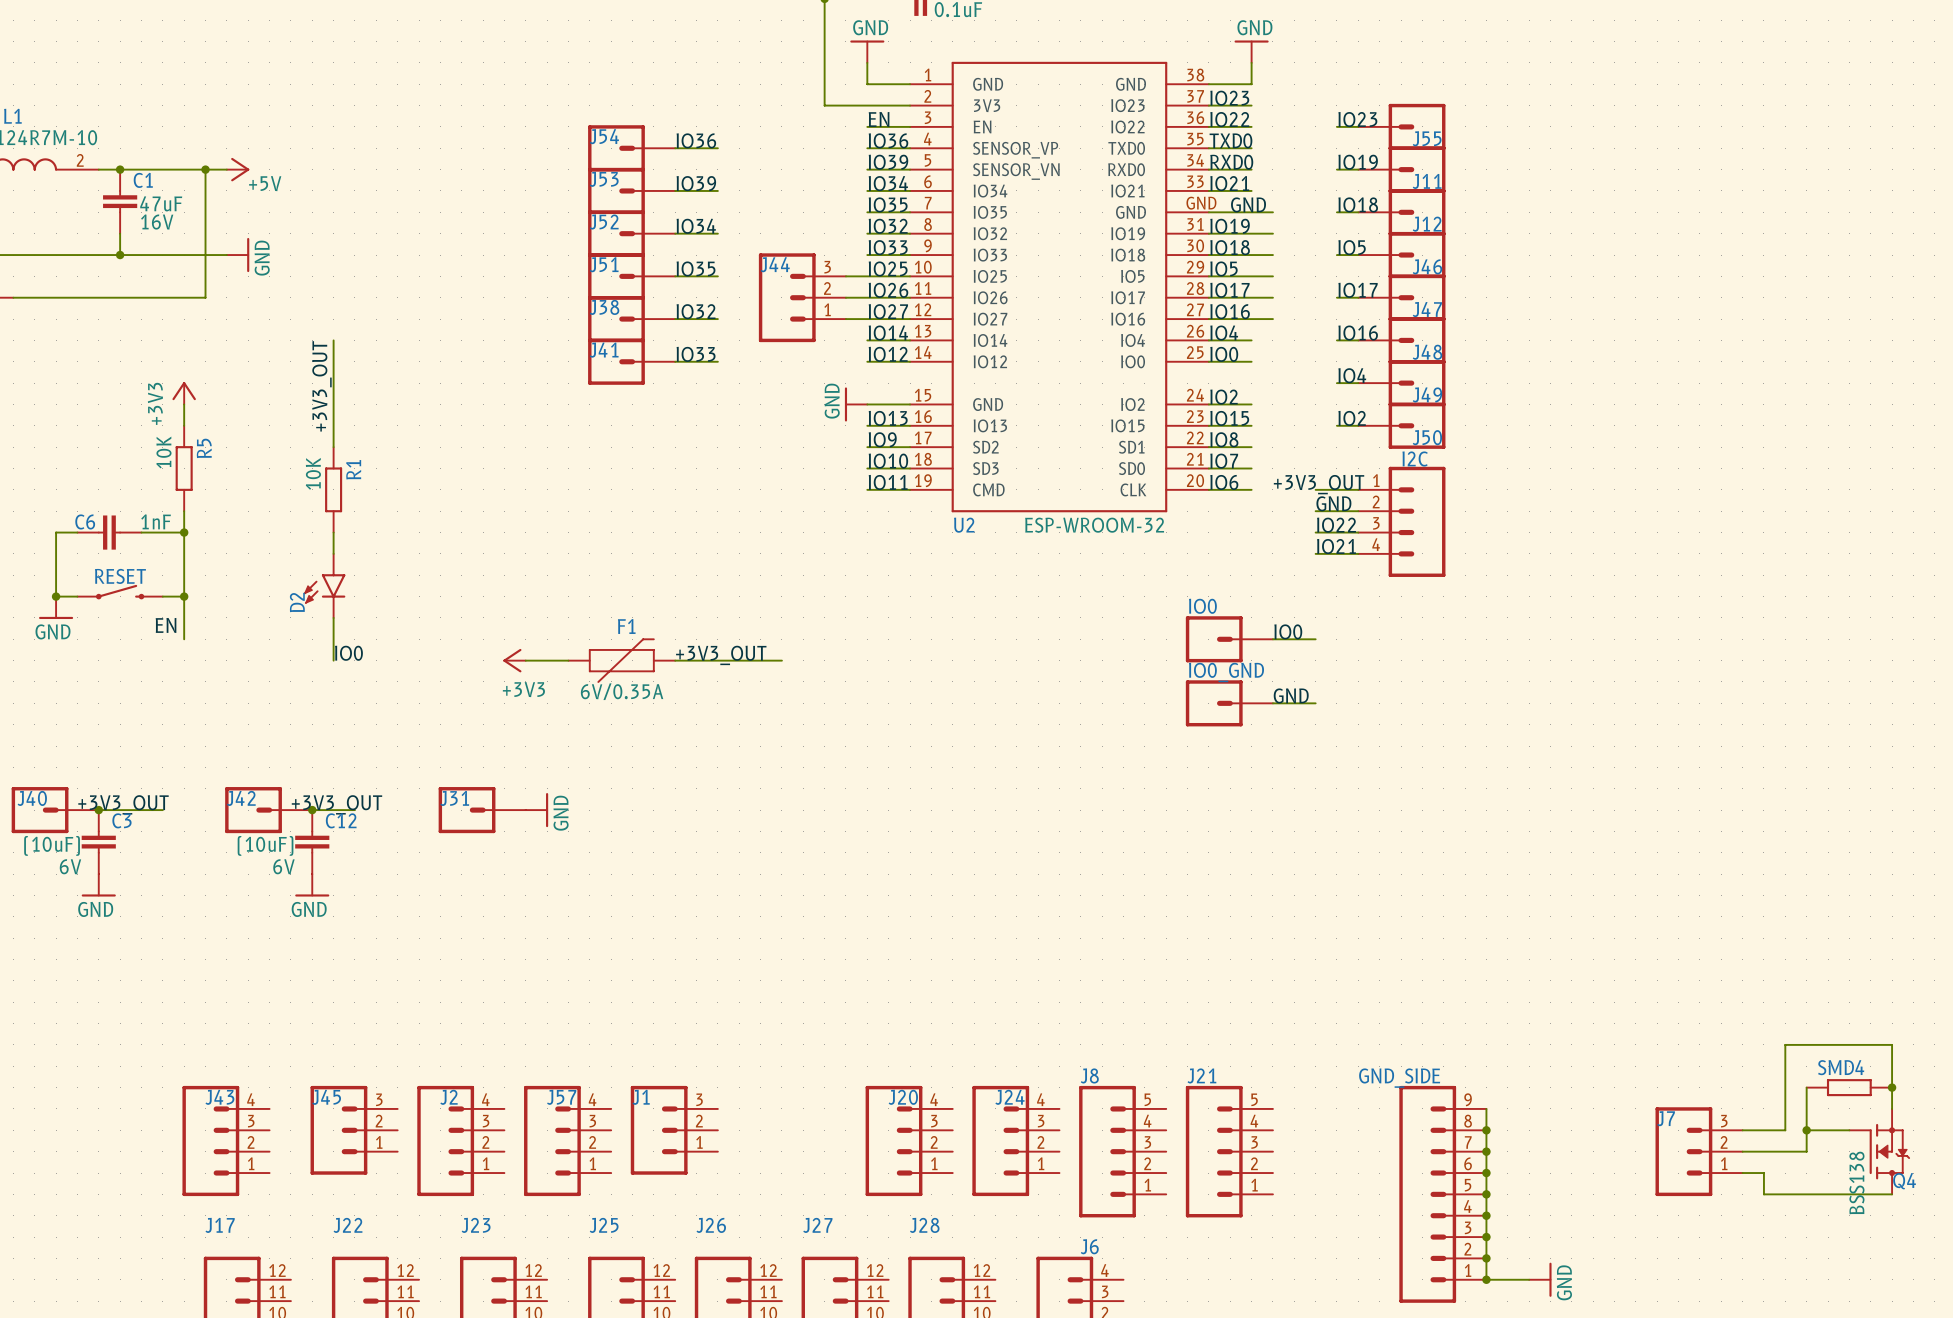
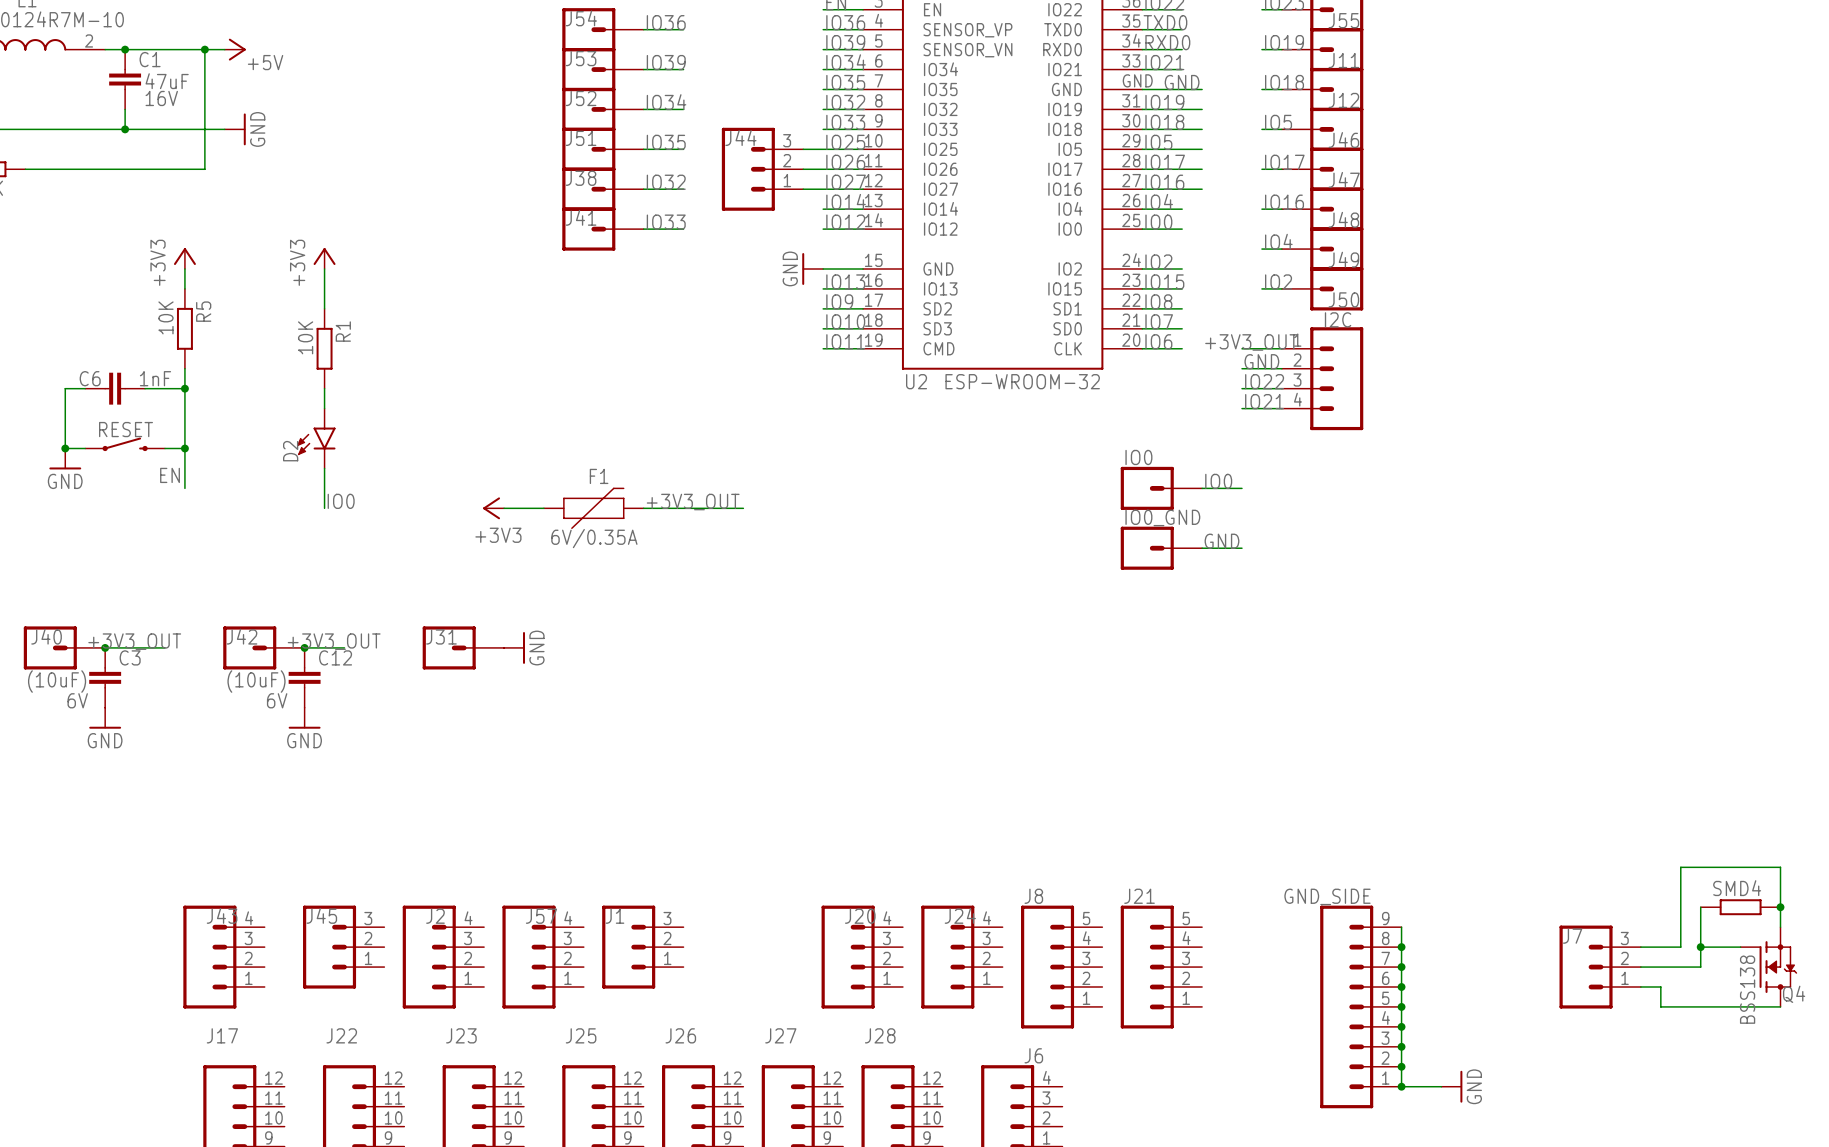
wire: (333, 340) (333, 404) -> none
label: +3V3_OUT (321, 386) -> none
power symbol: none -> +3V3 (324, 258)

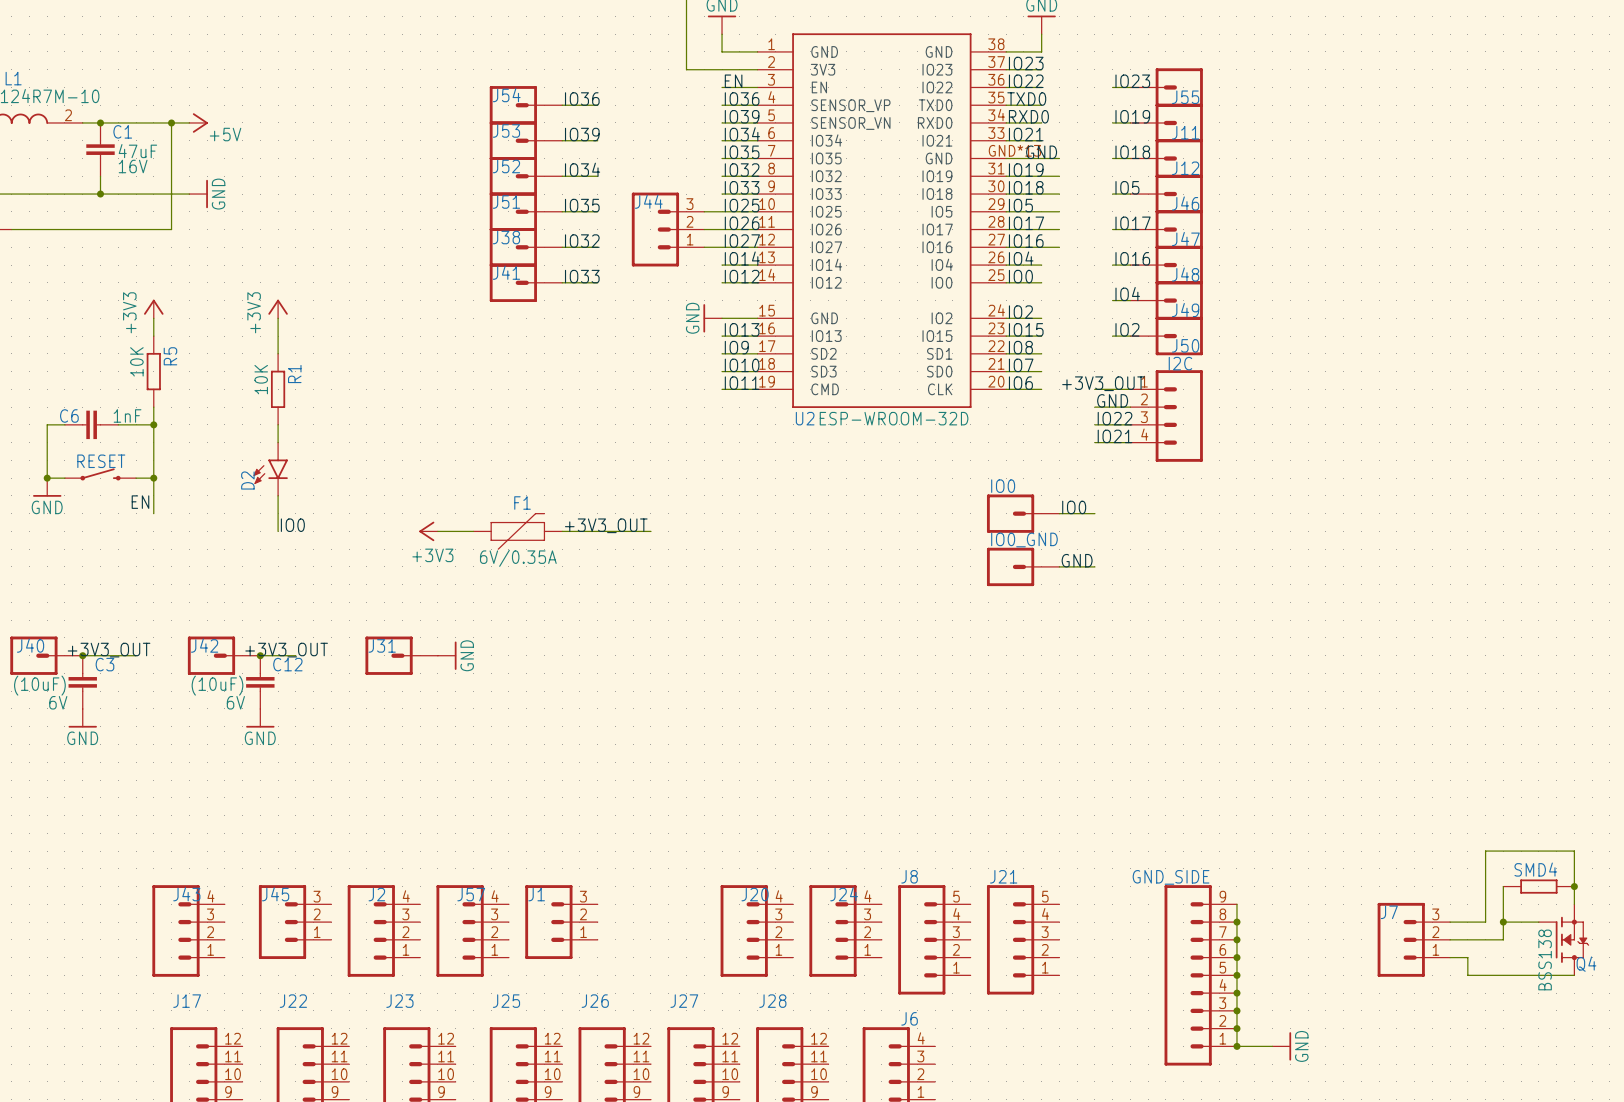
U2 pin number: GND (1137, 80) -> GND*13 (1014, 150)
U2 value: ESP-WROOM-32 (1022, 381) -> ESP-WROOM-32D (894, 418)

